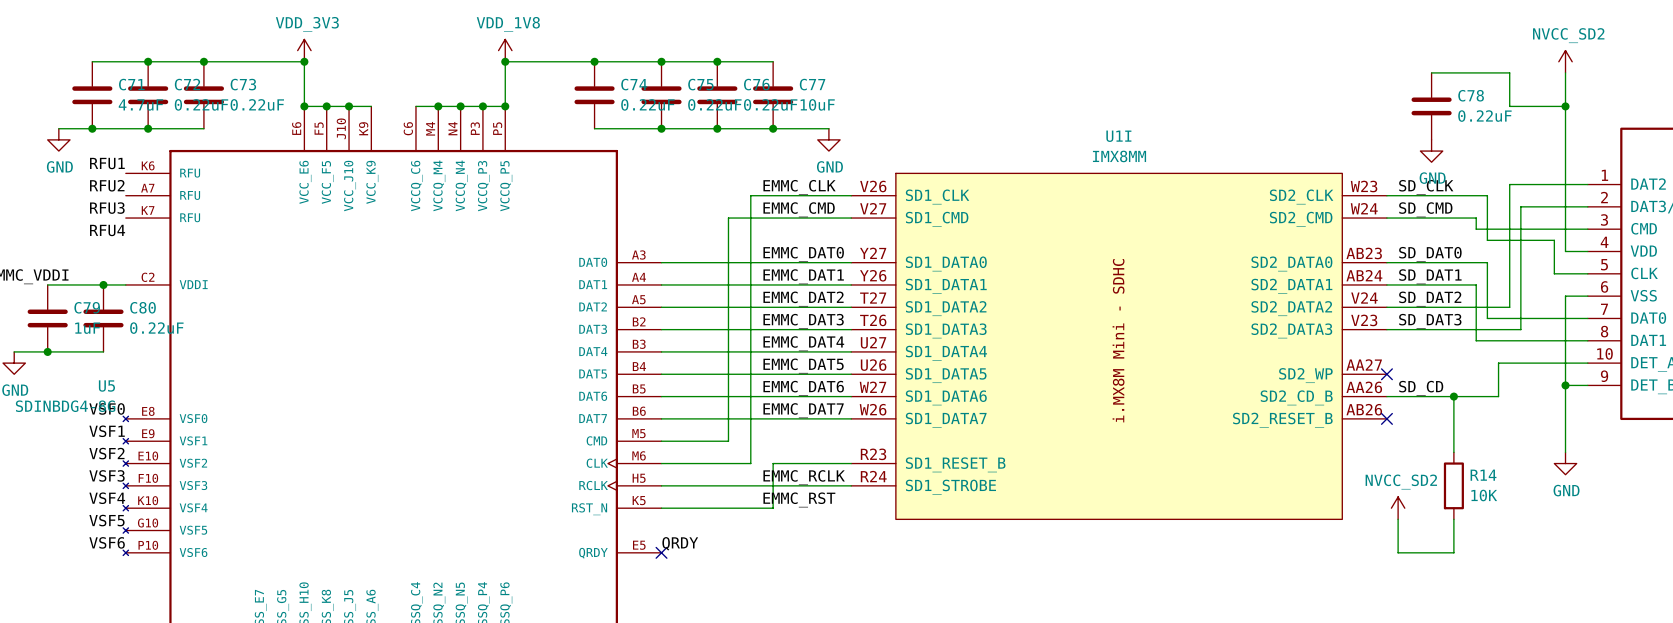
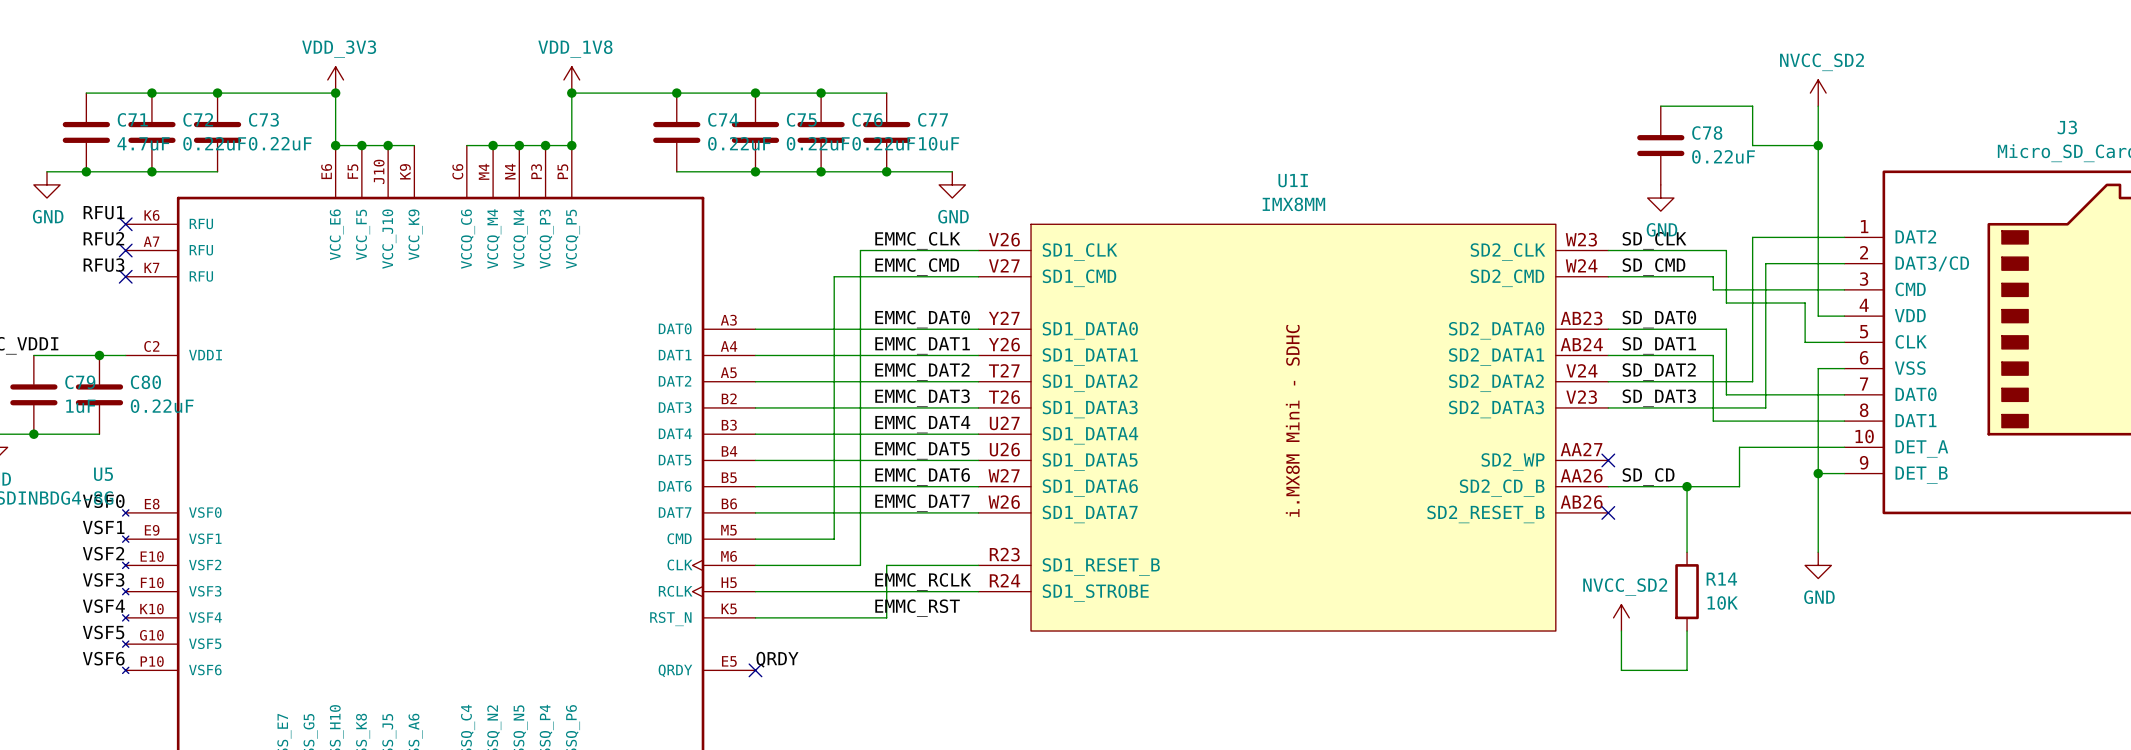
no-connect mark: none -> (125, 224)
no-connect mark: none -> (125, 250)
no-connect mark: none -> (125, 276)
label: RFU4 (107, 230) -> none

